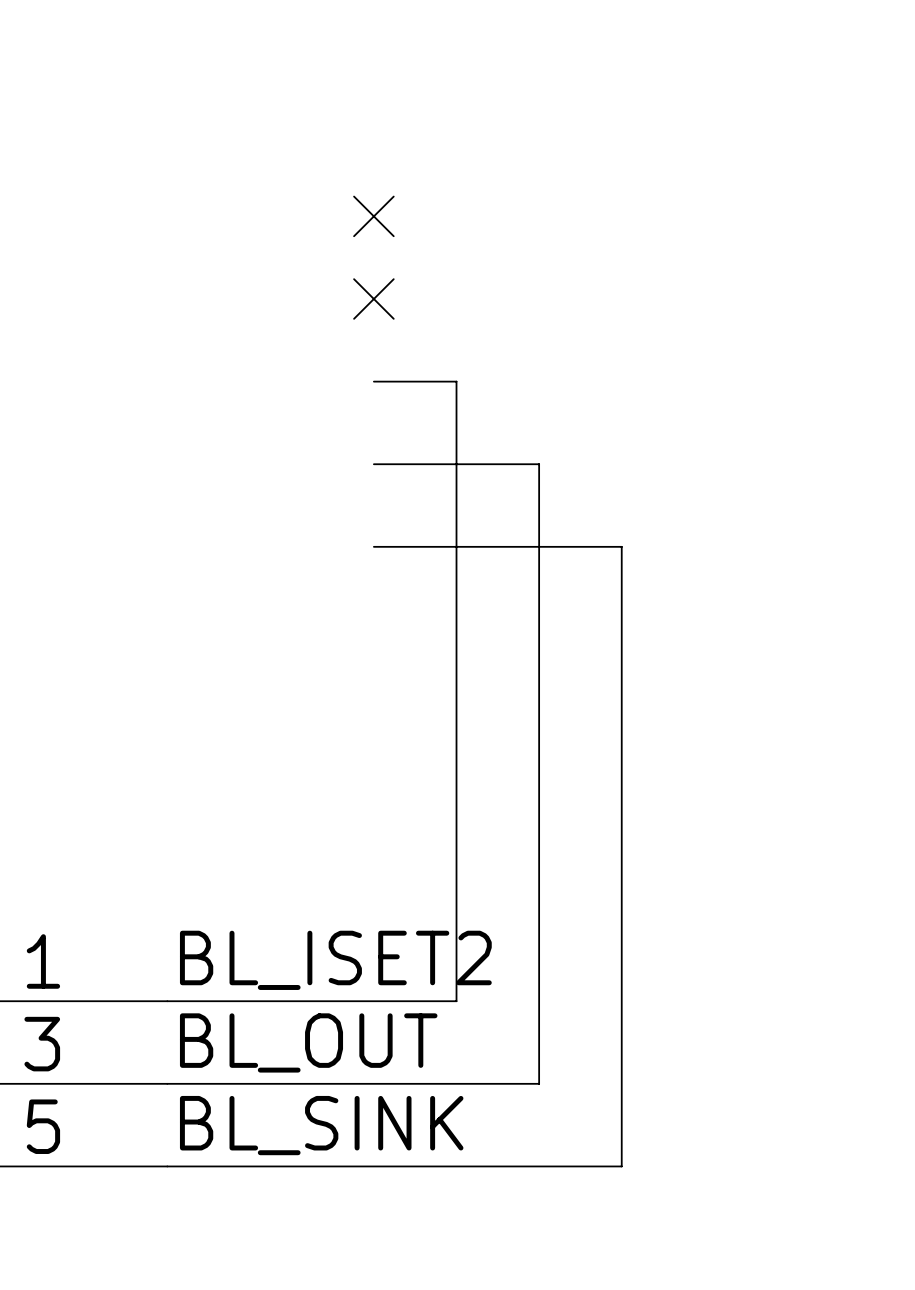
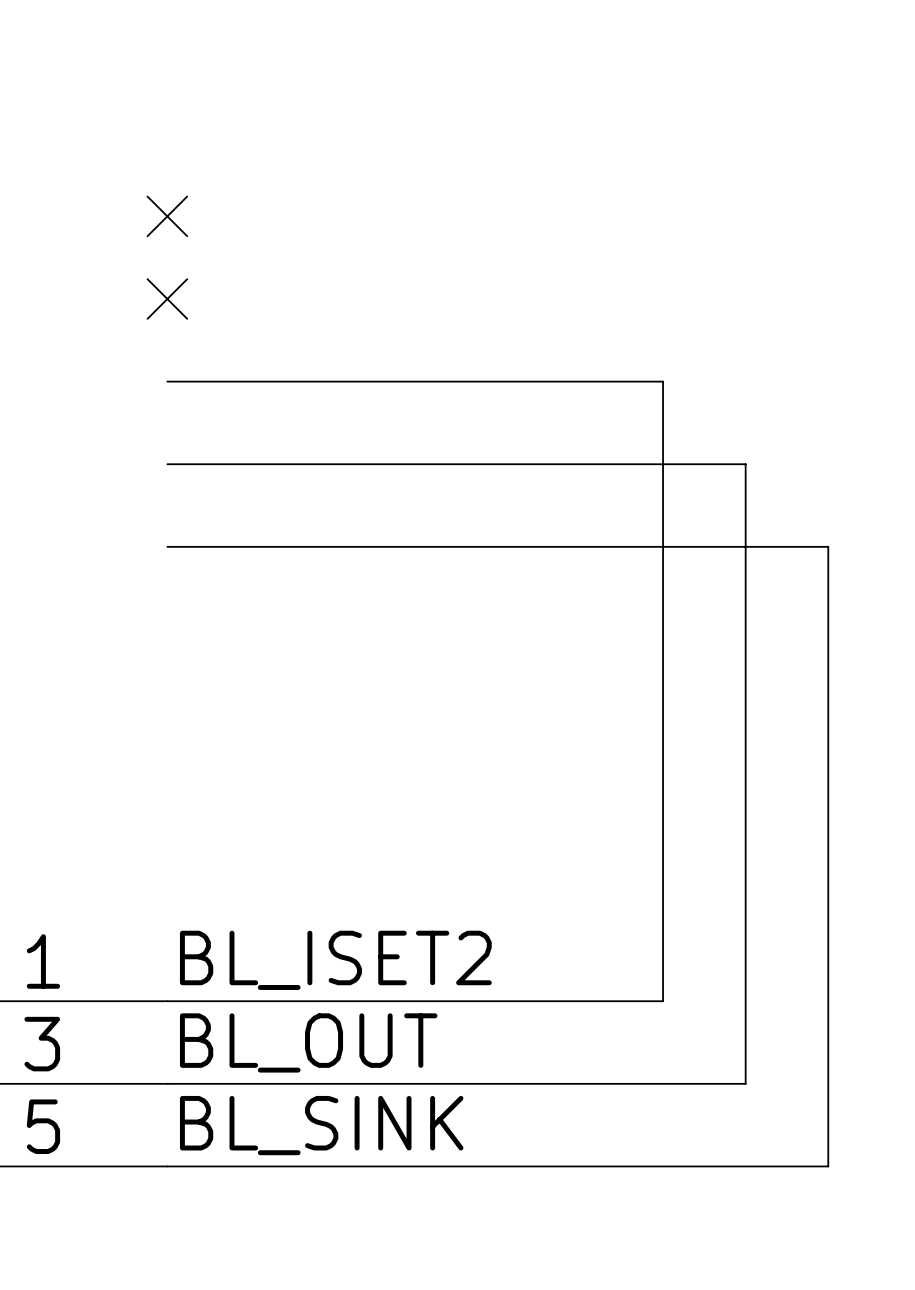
no-connect mark: none -> (167, 216)
no-connect mark: (373, 216) -> none
no-connect mark: none -> (167, 299)
no-connect mark: (373, 299) -> none
wire: none -> (167, 381) (373, 381)
wire: (456, 381) (456, 1001) -> (456, 381) (663, 381) (663, 1001) (456, 1001)
wire: none -> (167, 464) (373, 464)
wire: (539, 464) (539, 1083) -> (539, 464) (745, 464) (745, 1083) (539, 1083)
wire: none -> (167, 546) (373, 546)
wire: (621, 546) (621, 1166) -> (621, 546) (828, 546) (828, 1166) (621, 1166)

